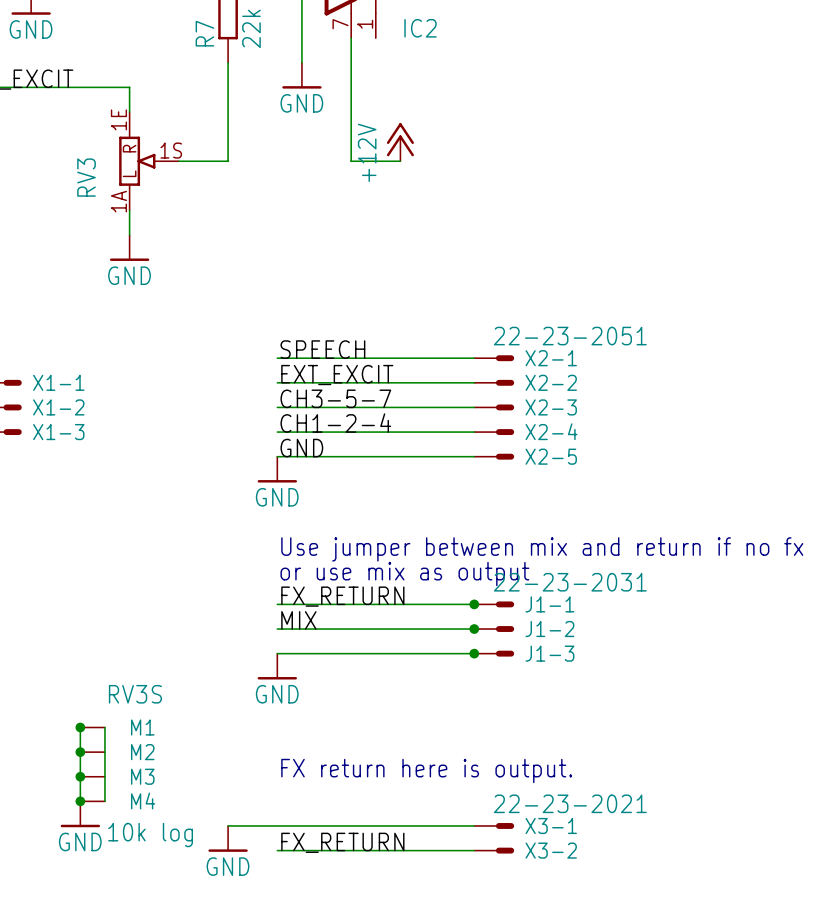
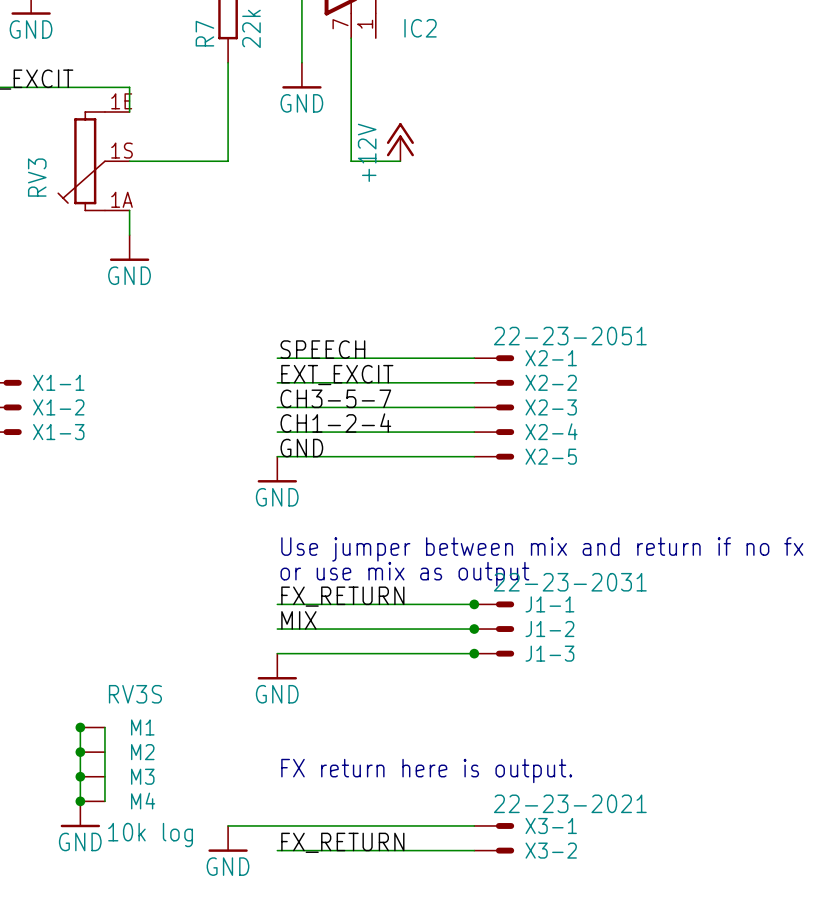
RV3 symbol: [119, 112, 179, 211] -> [57, 111, 130, 212]

